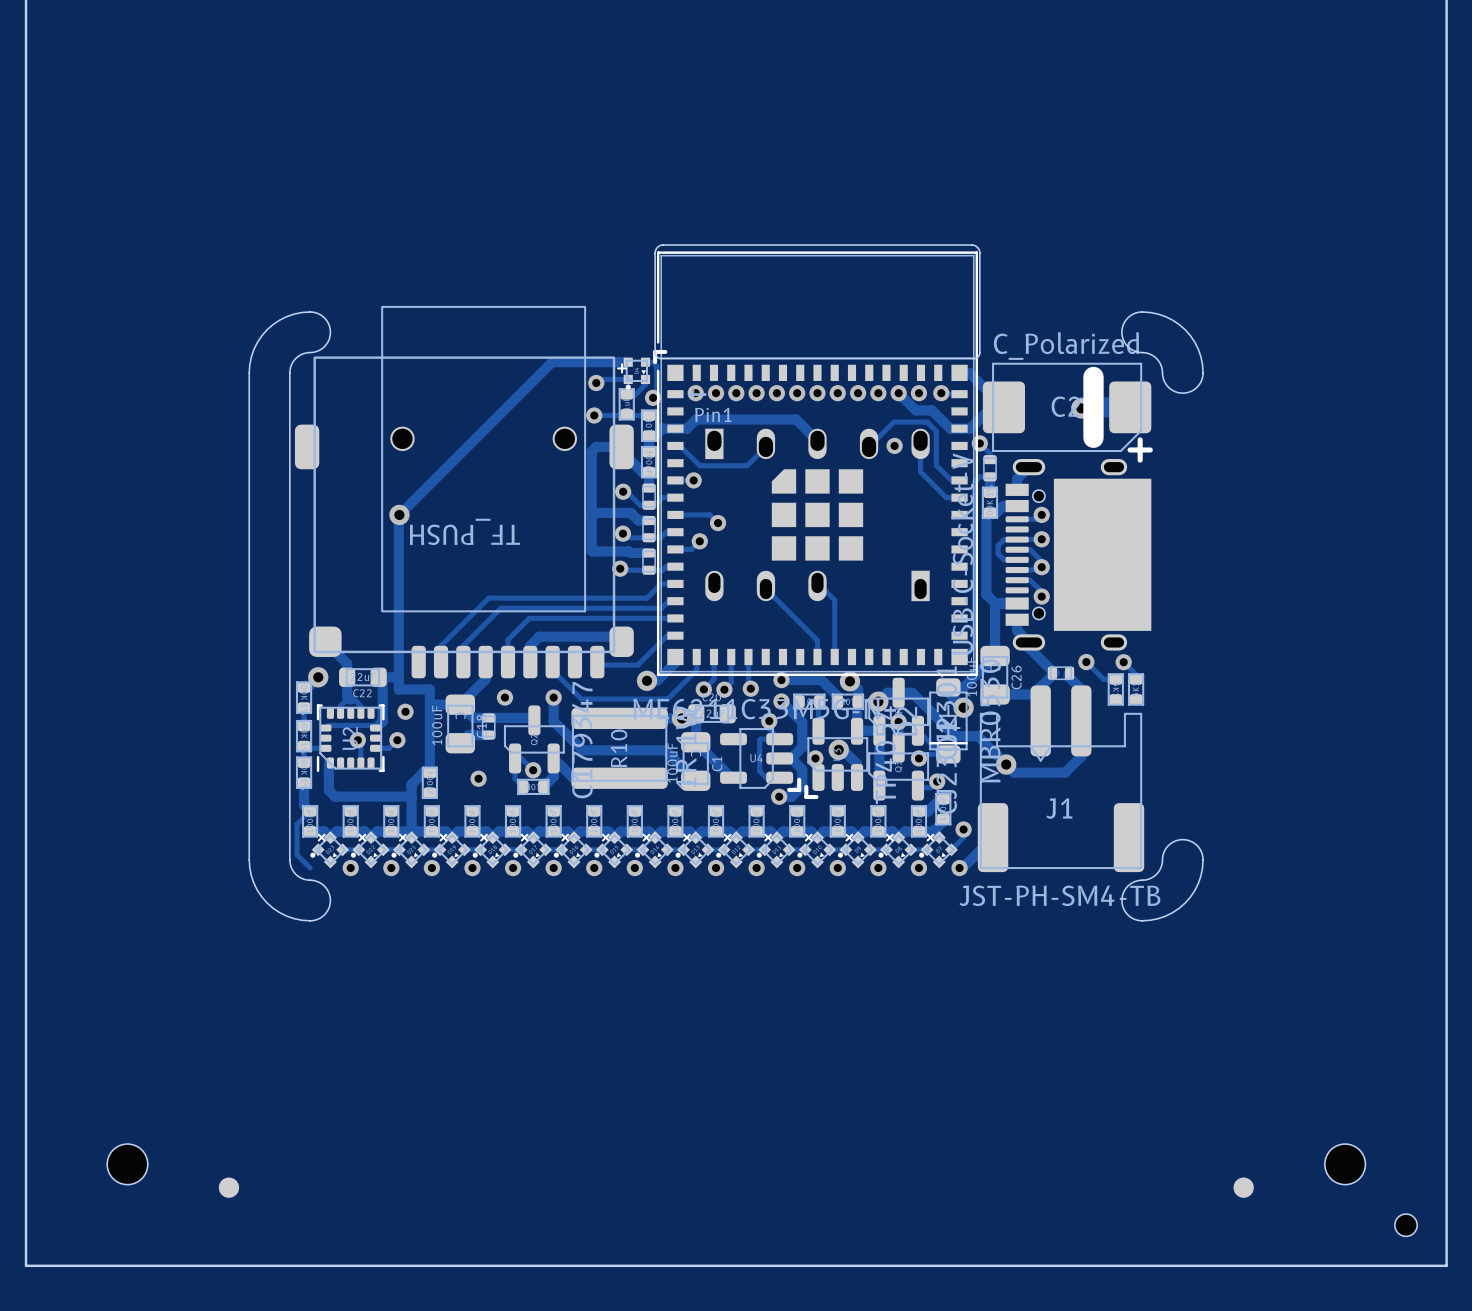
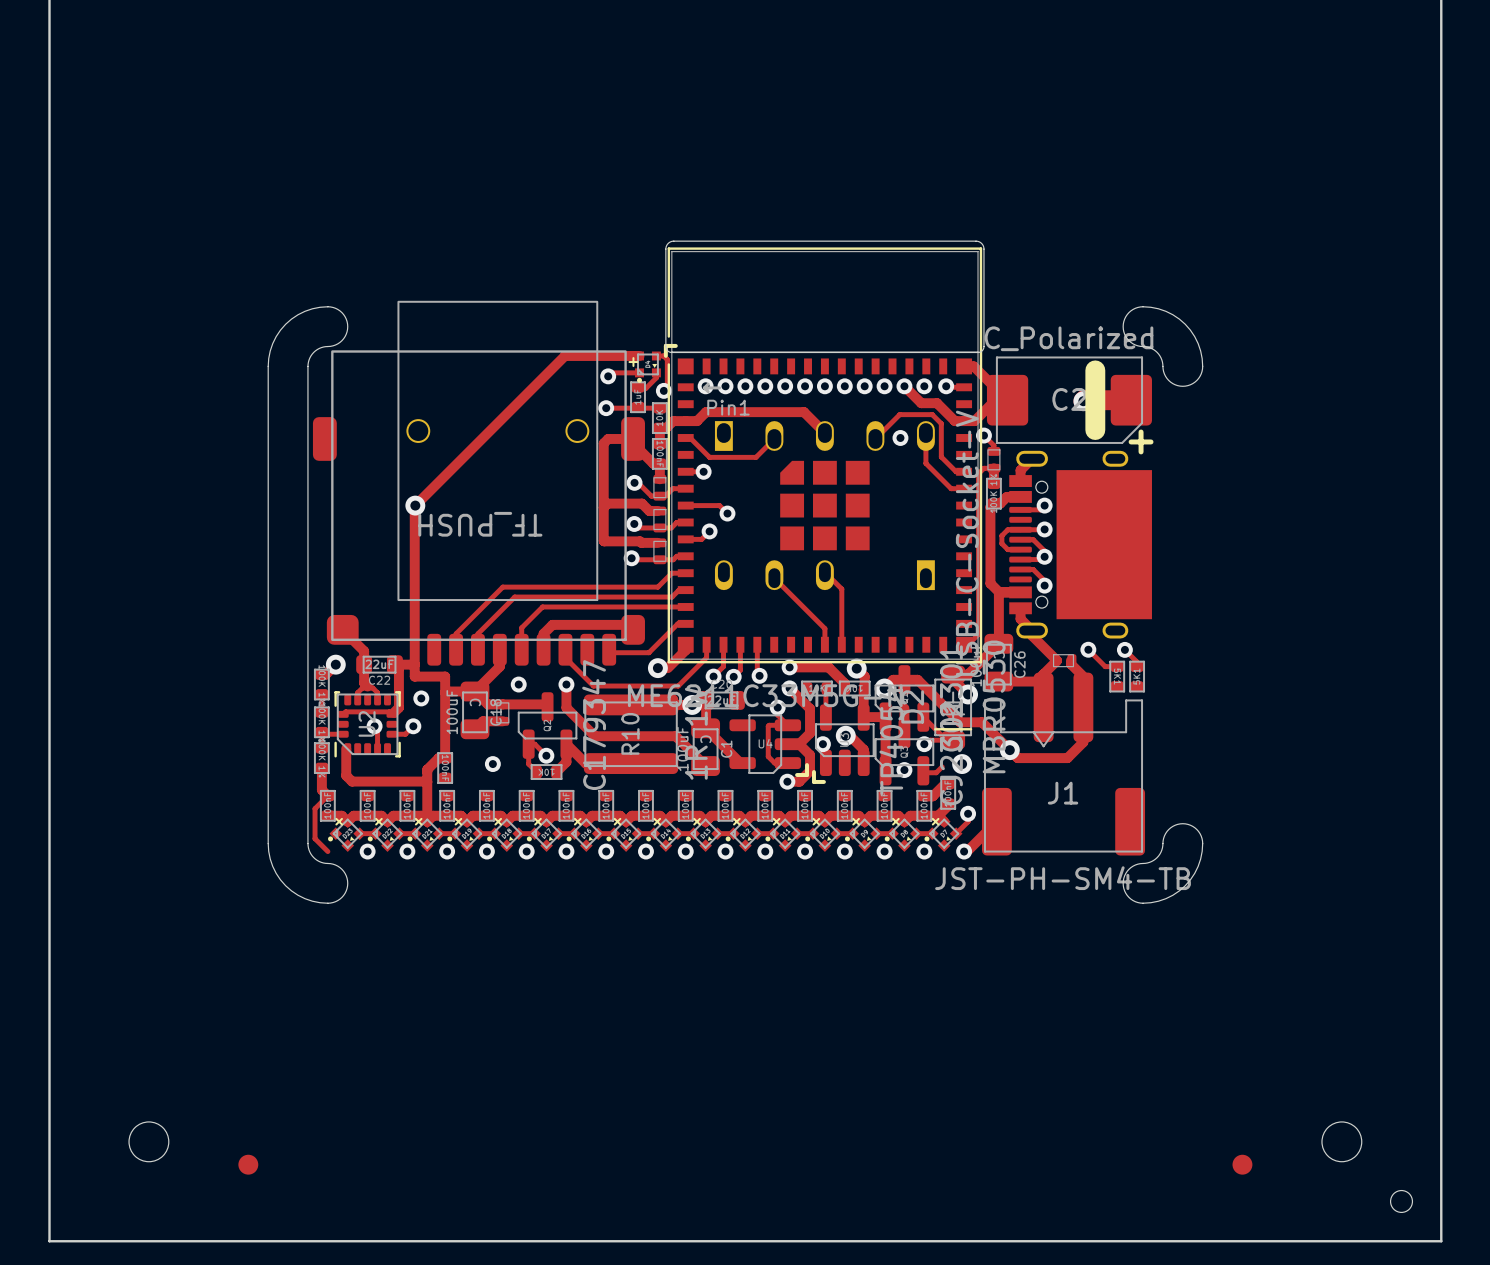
via: (898, 721) -> none
via: none -> (962, 764)
via: (937, 781) -> none
via: none -> (904, 770)

